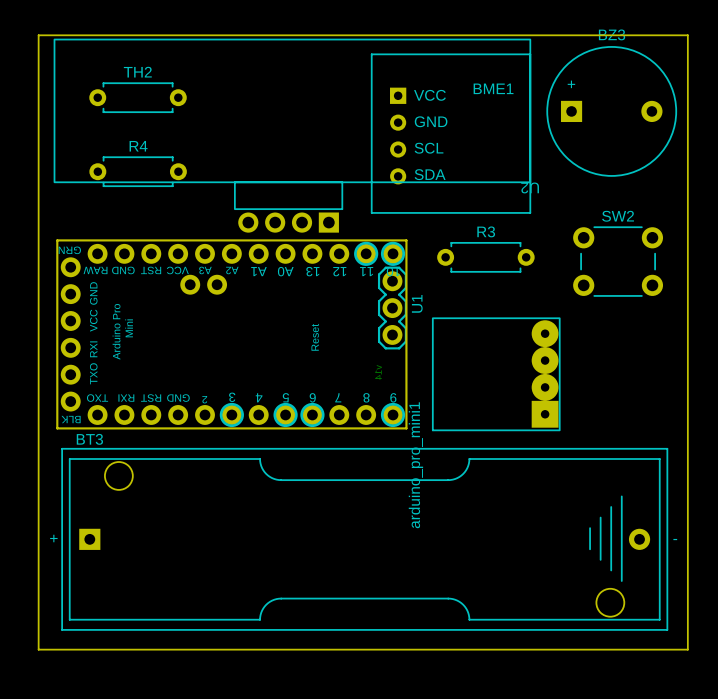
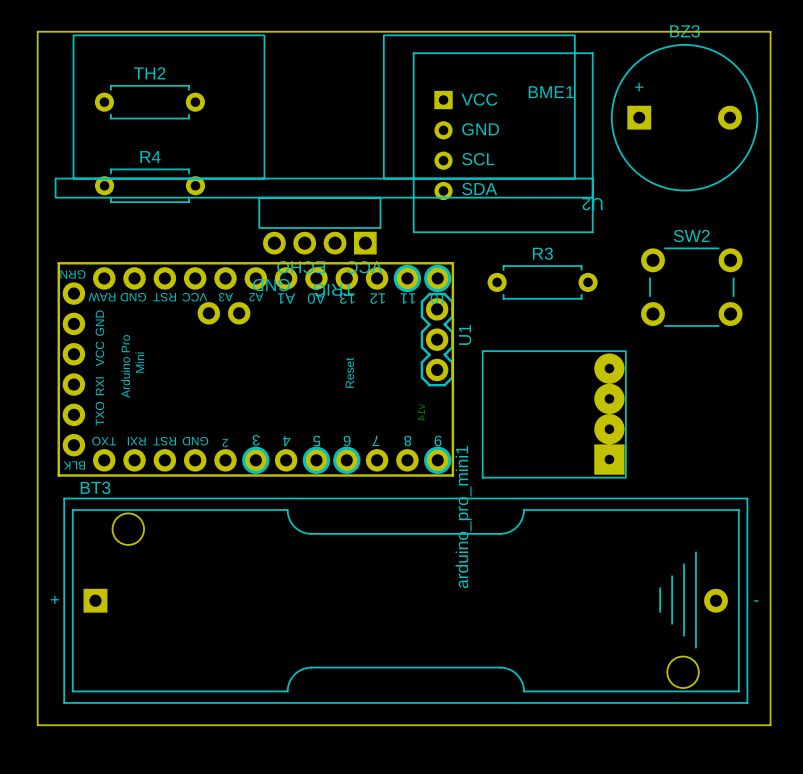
U2 footprint: [53, 39, 531, 233] -> [55, 34, 594, 255]

